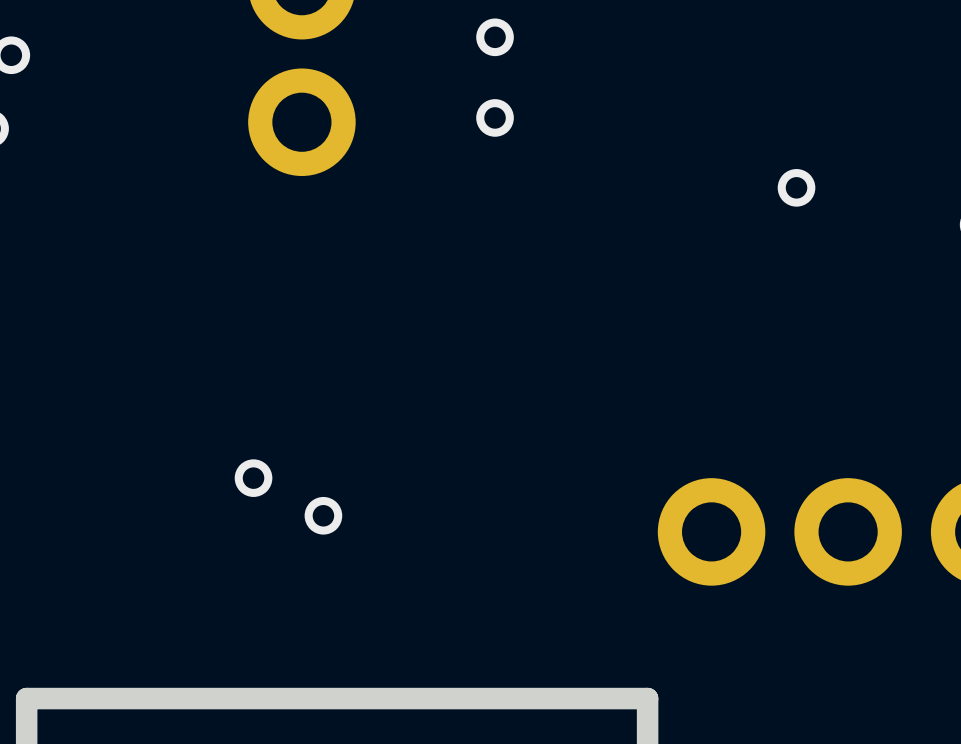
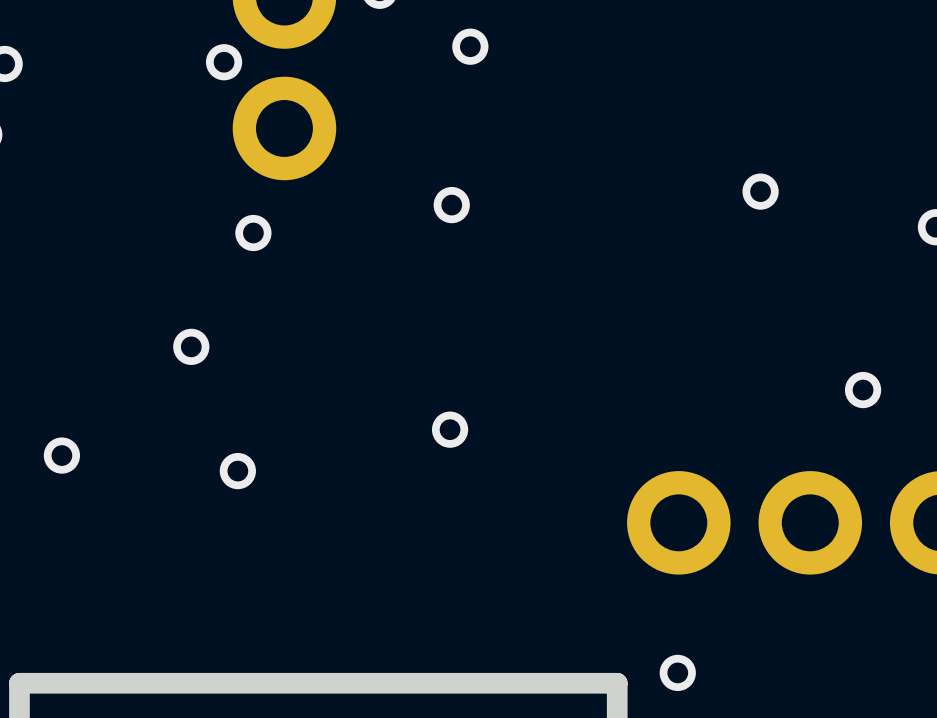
via: none -> (224, 62)
via position: (495, 117) -> (451, 205)
via: none -> (253, 233)
via: none -> (191, 346)
via: none -> (863, 390)
via: none -> (450, 429)
via: none -> (61, 455)
via: (323, 515) -> none
via: none -> (677, 672)

